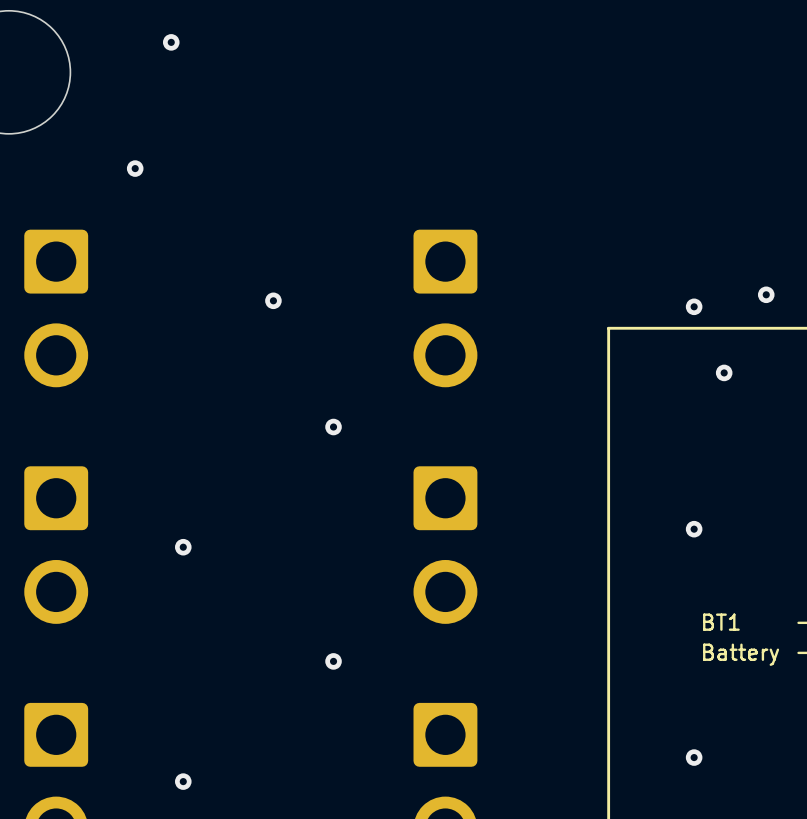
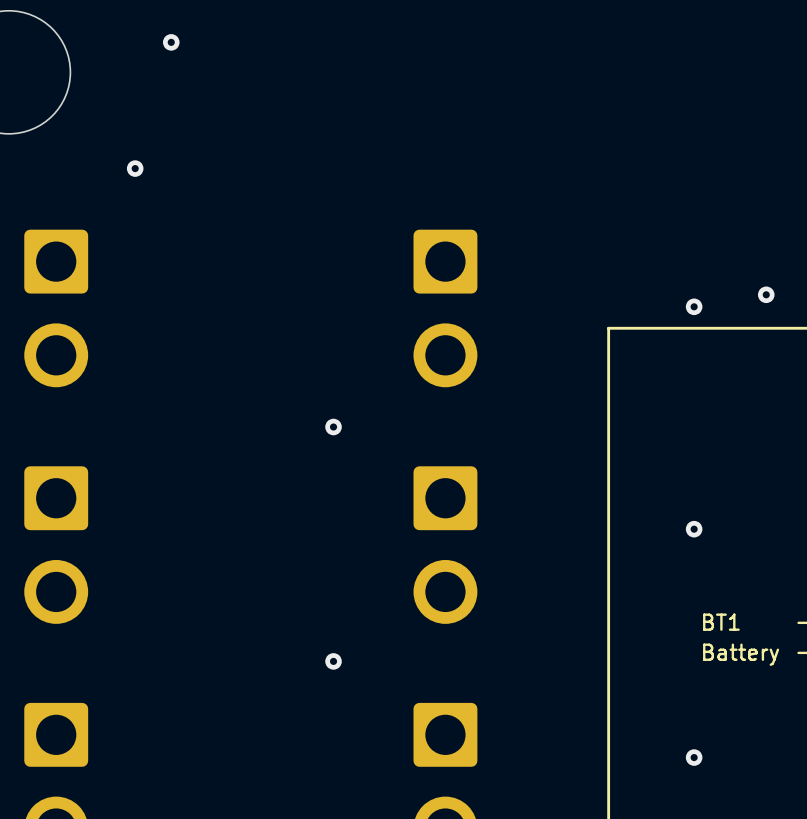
via: (273, 300) -> none
via: (724, 372) -> none
via: (183, 547) -> none
via: (183, 781) -> none

